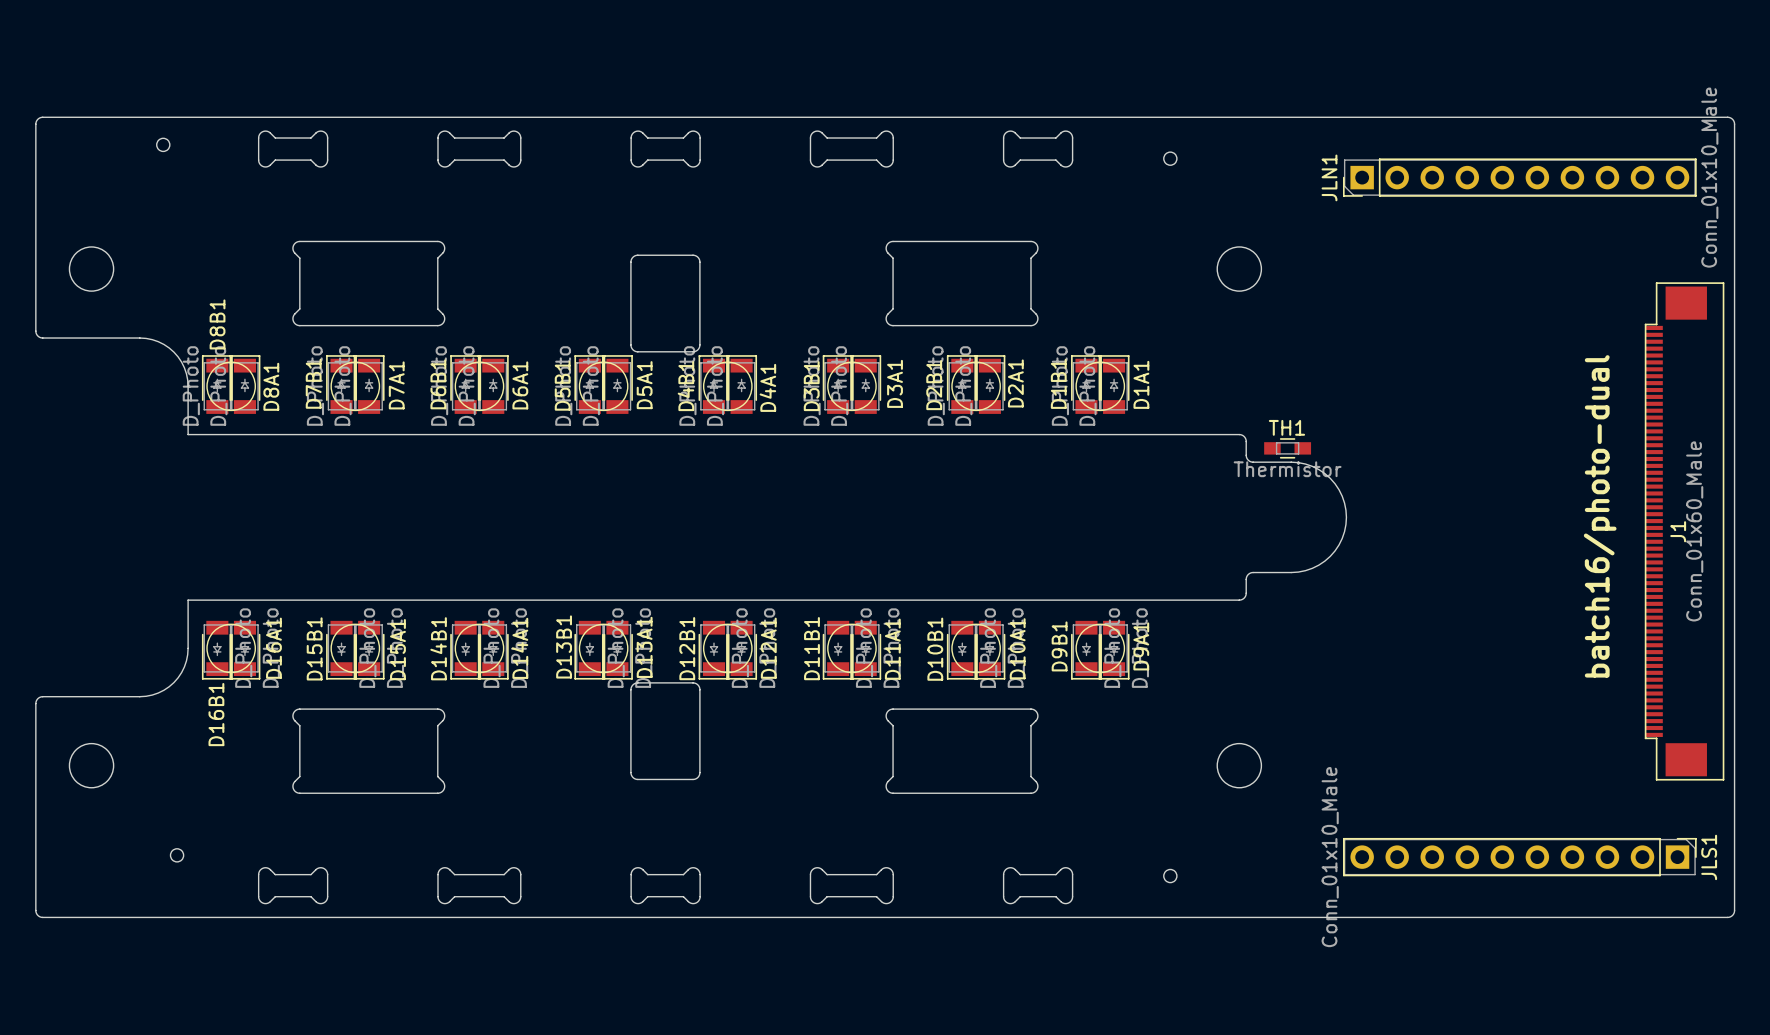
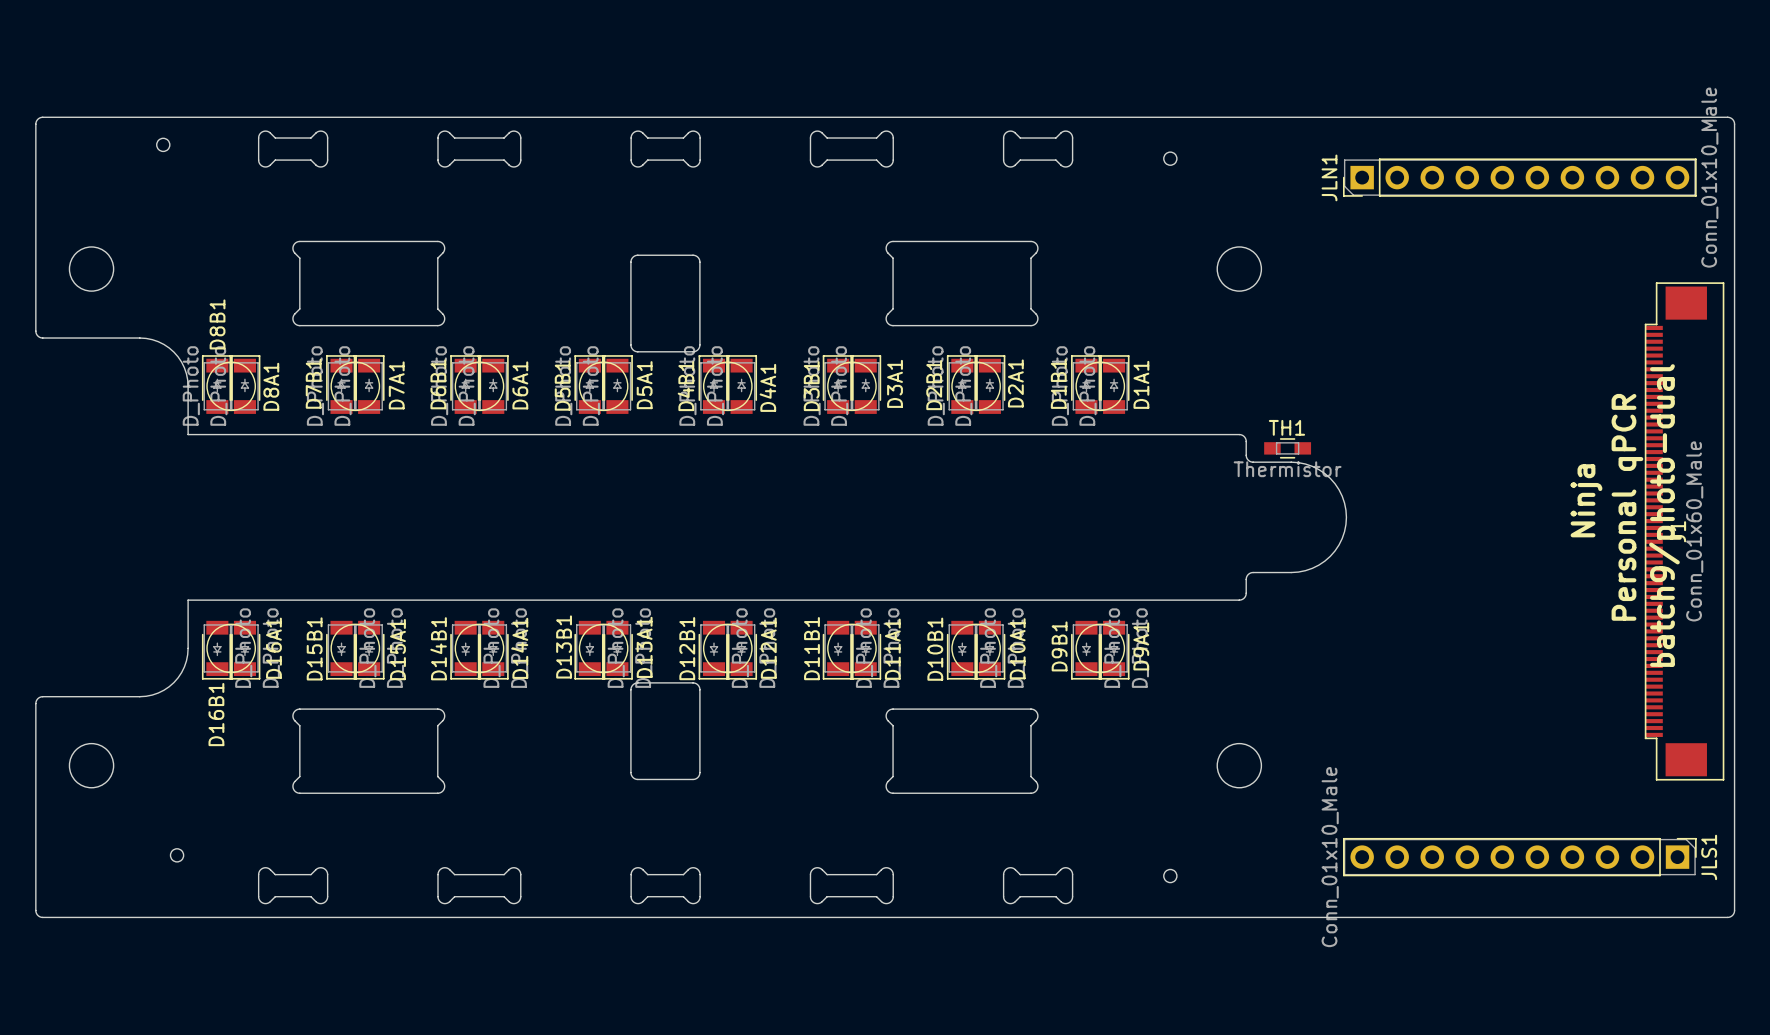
text: none -> Ninja (1586, 500)
text: none -> Personal qPCR (1627, 507)
text: none -> batch9/photo-dual (1665, 515)
text: batch16/photo-dual (1600, 516) -> none

